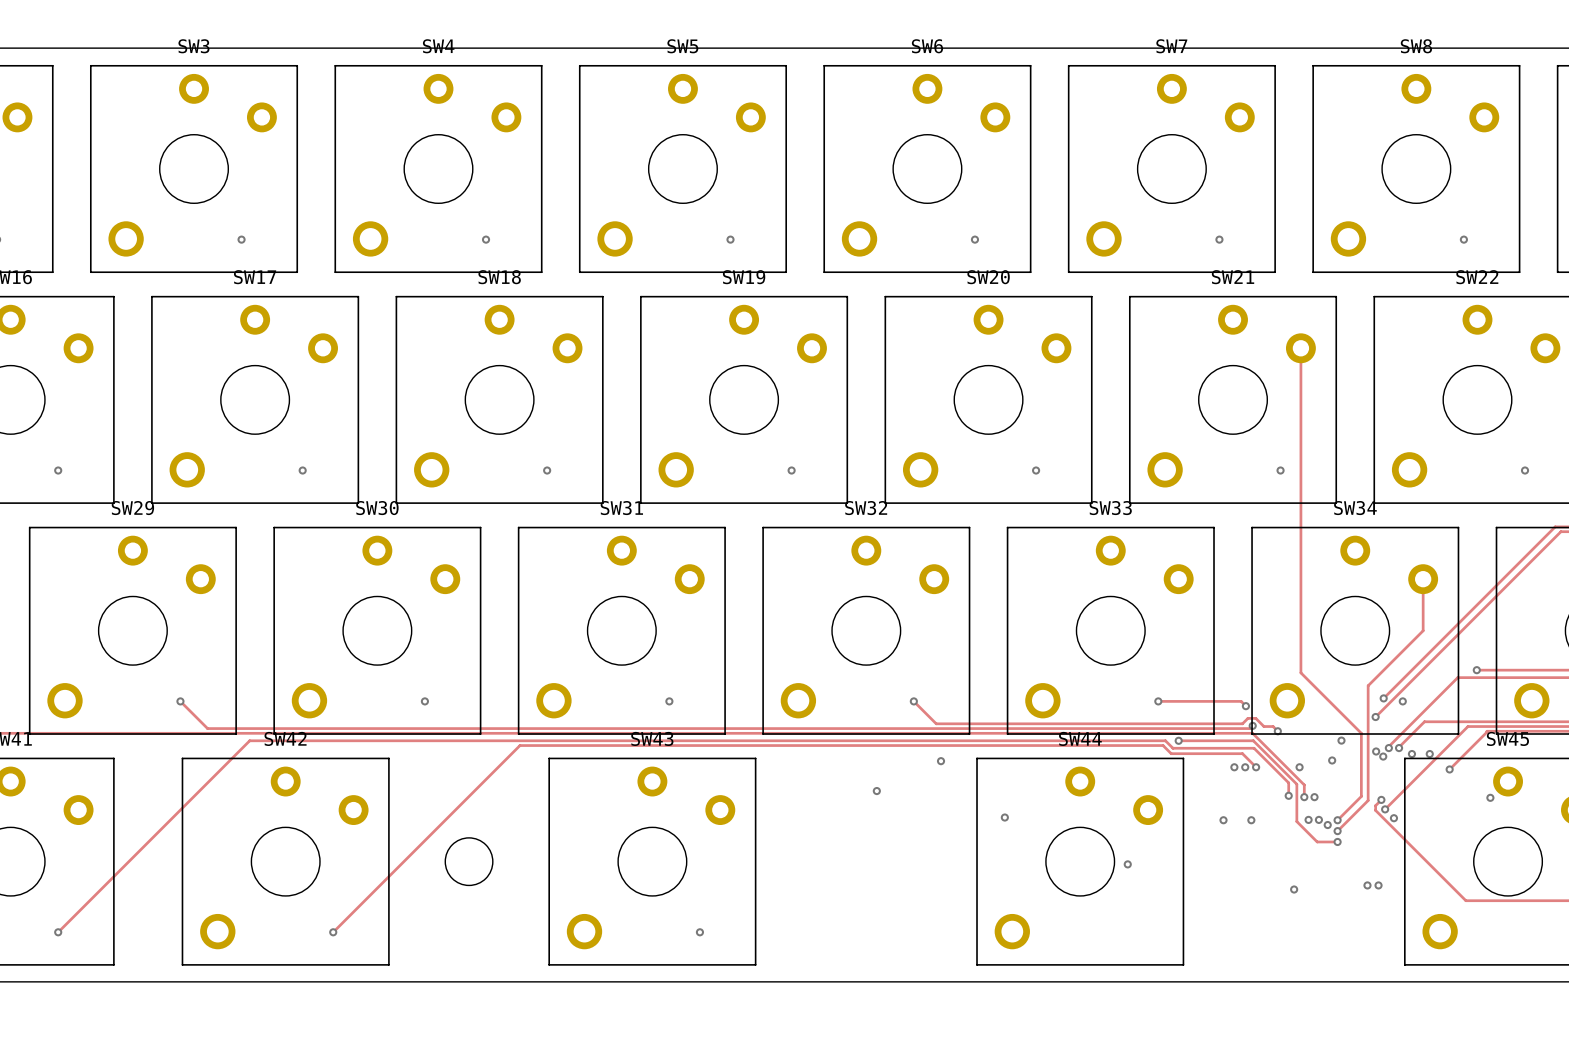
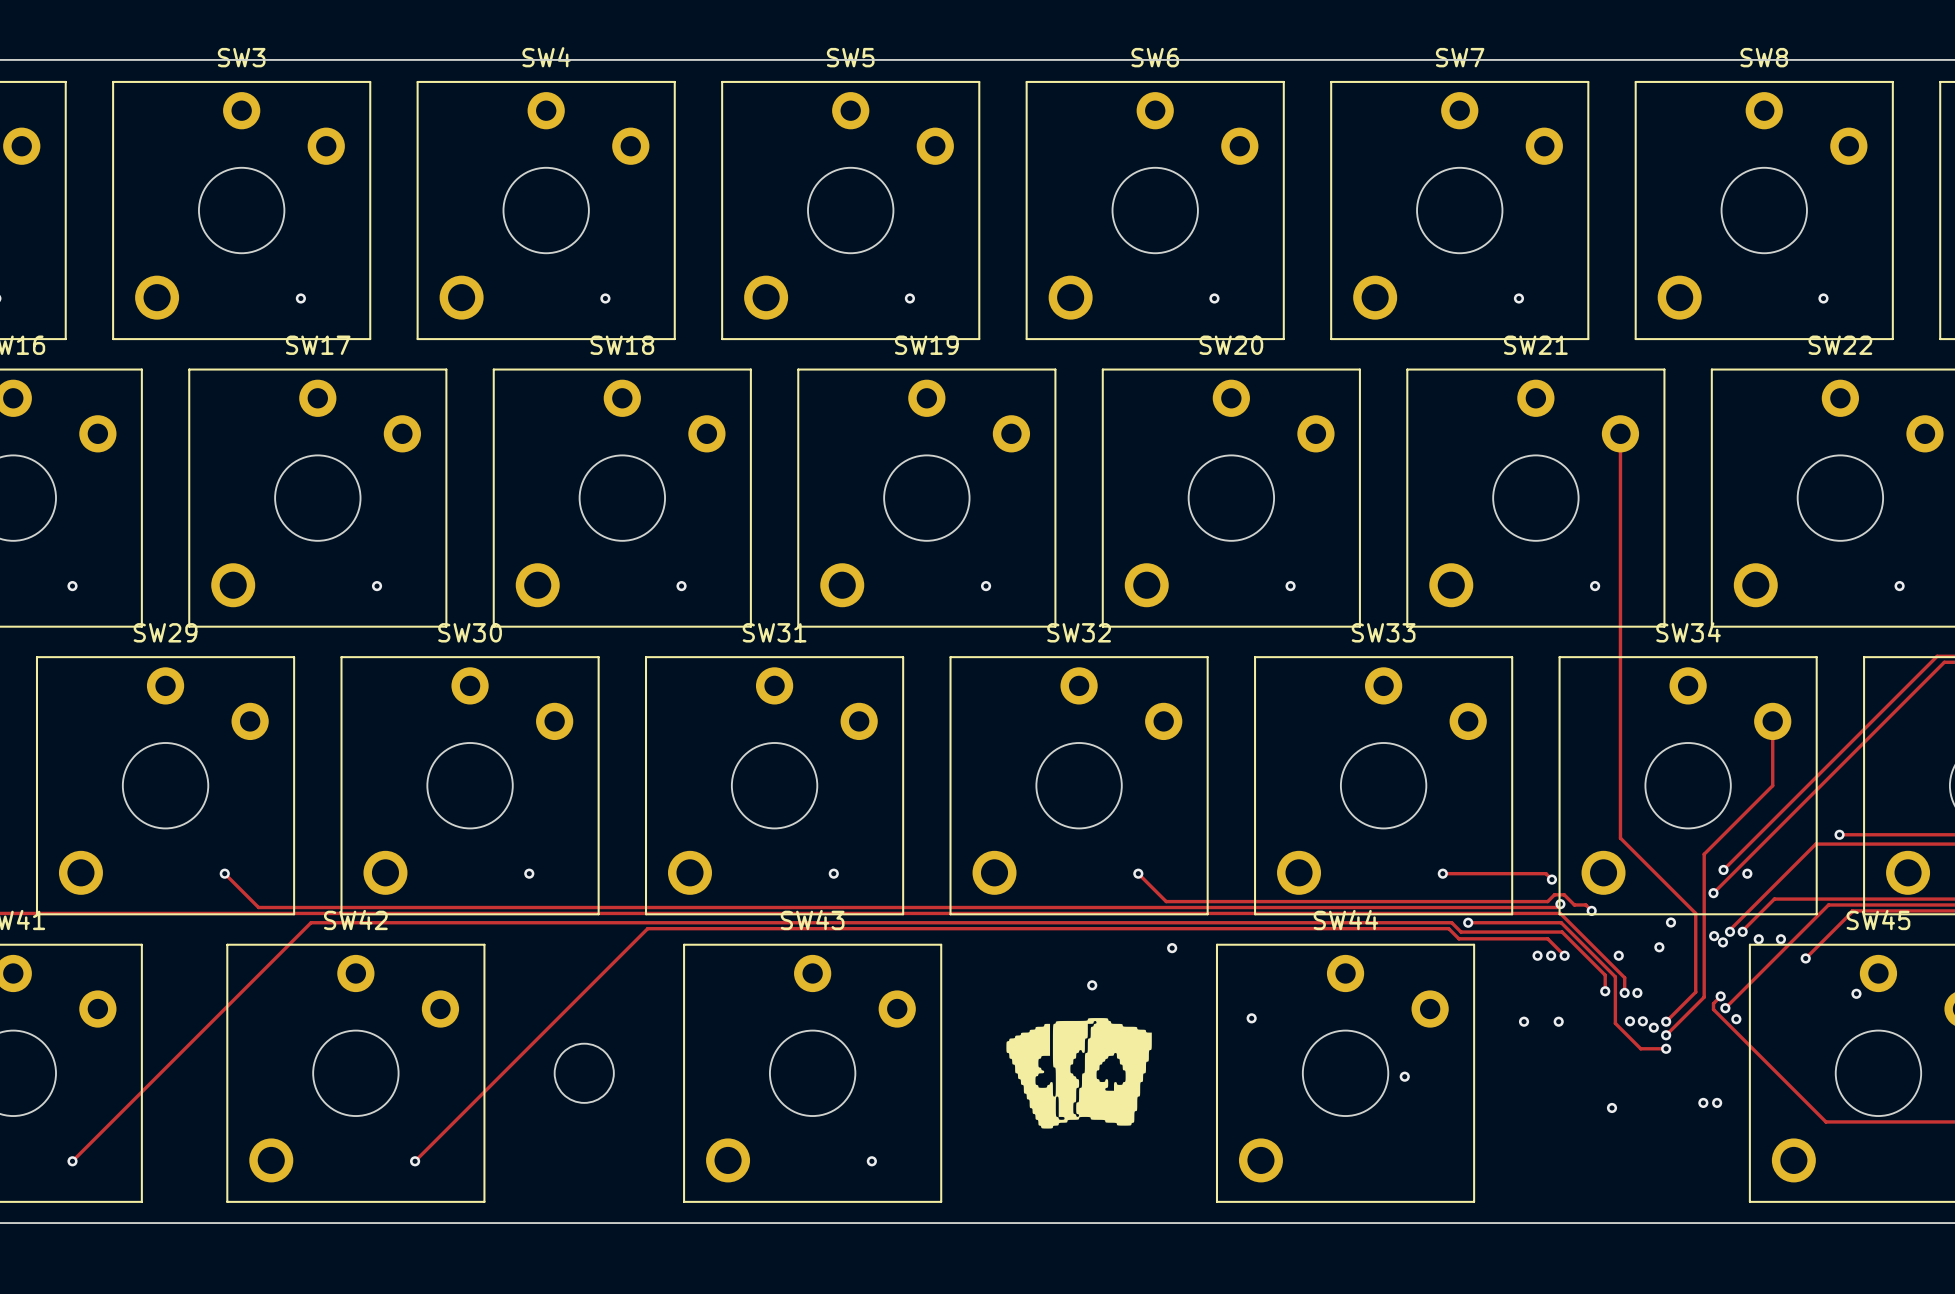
drawing: none -> [1006, 1018, 1152, 1129]

